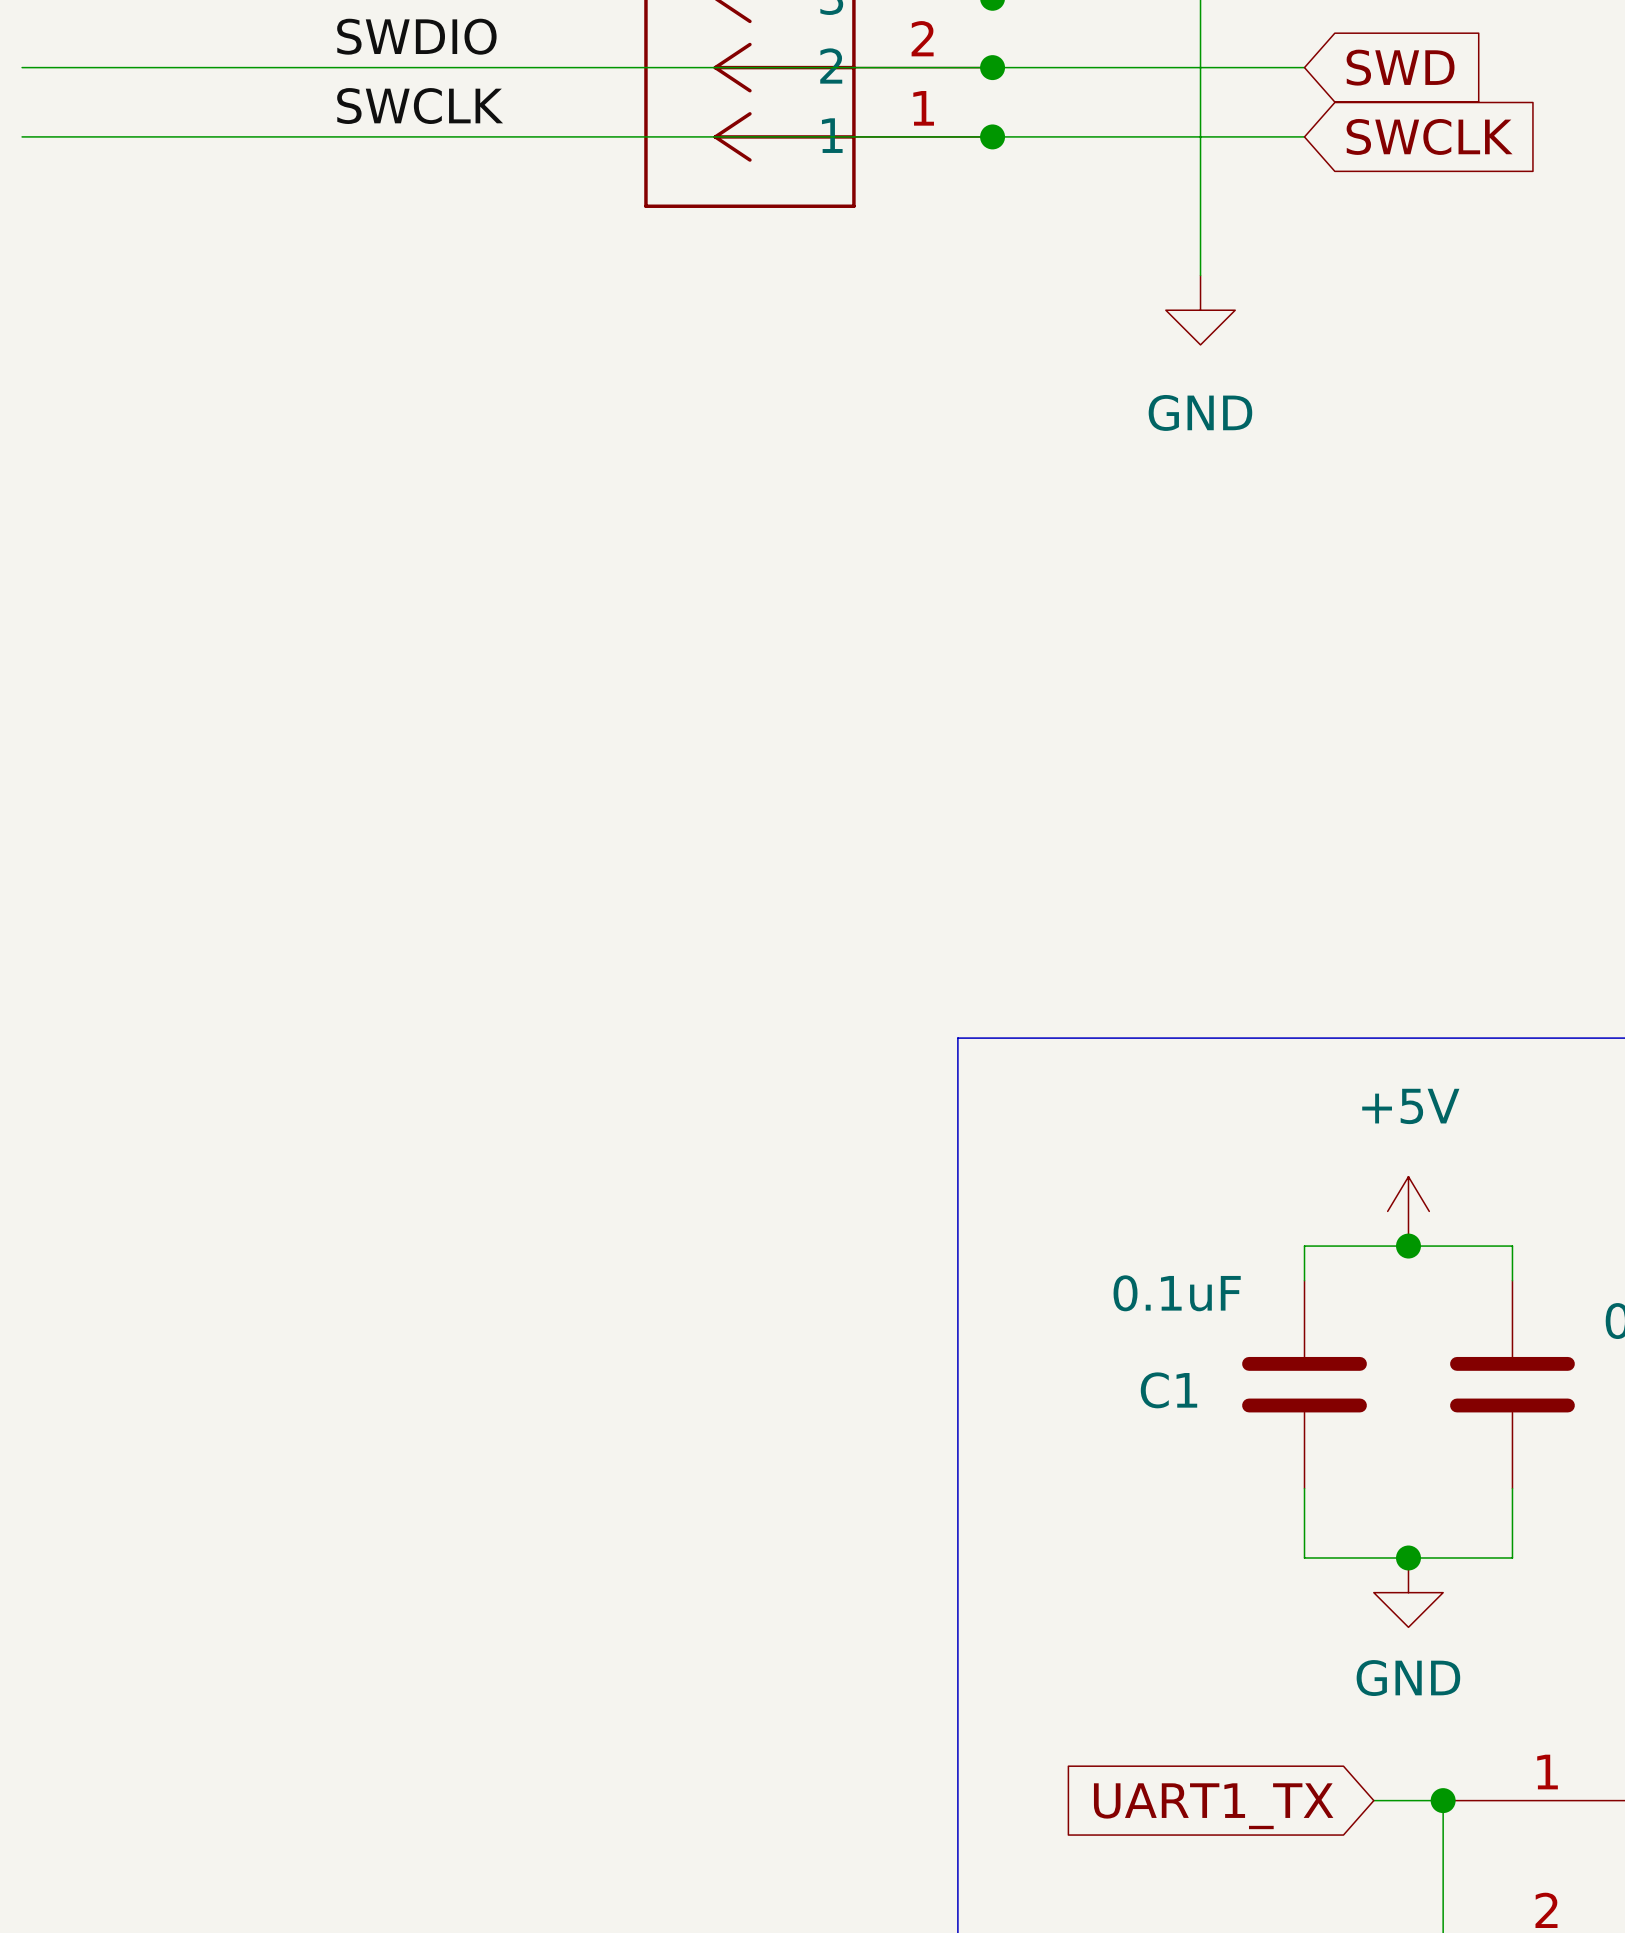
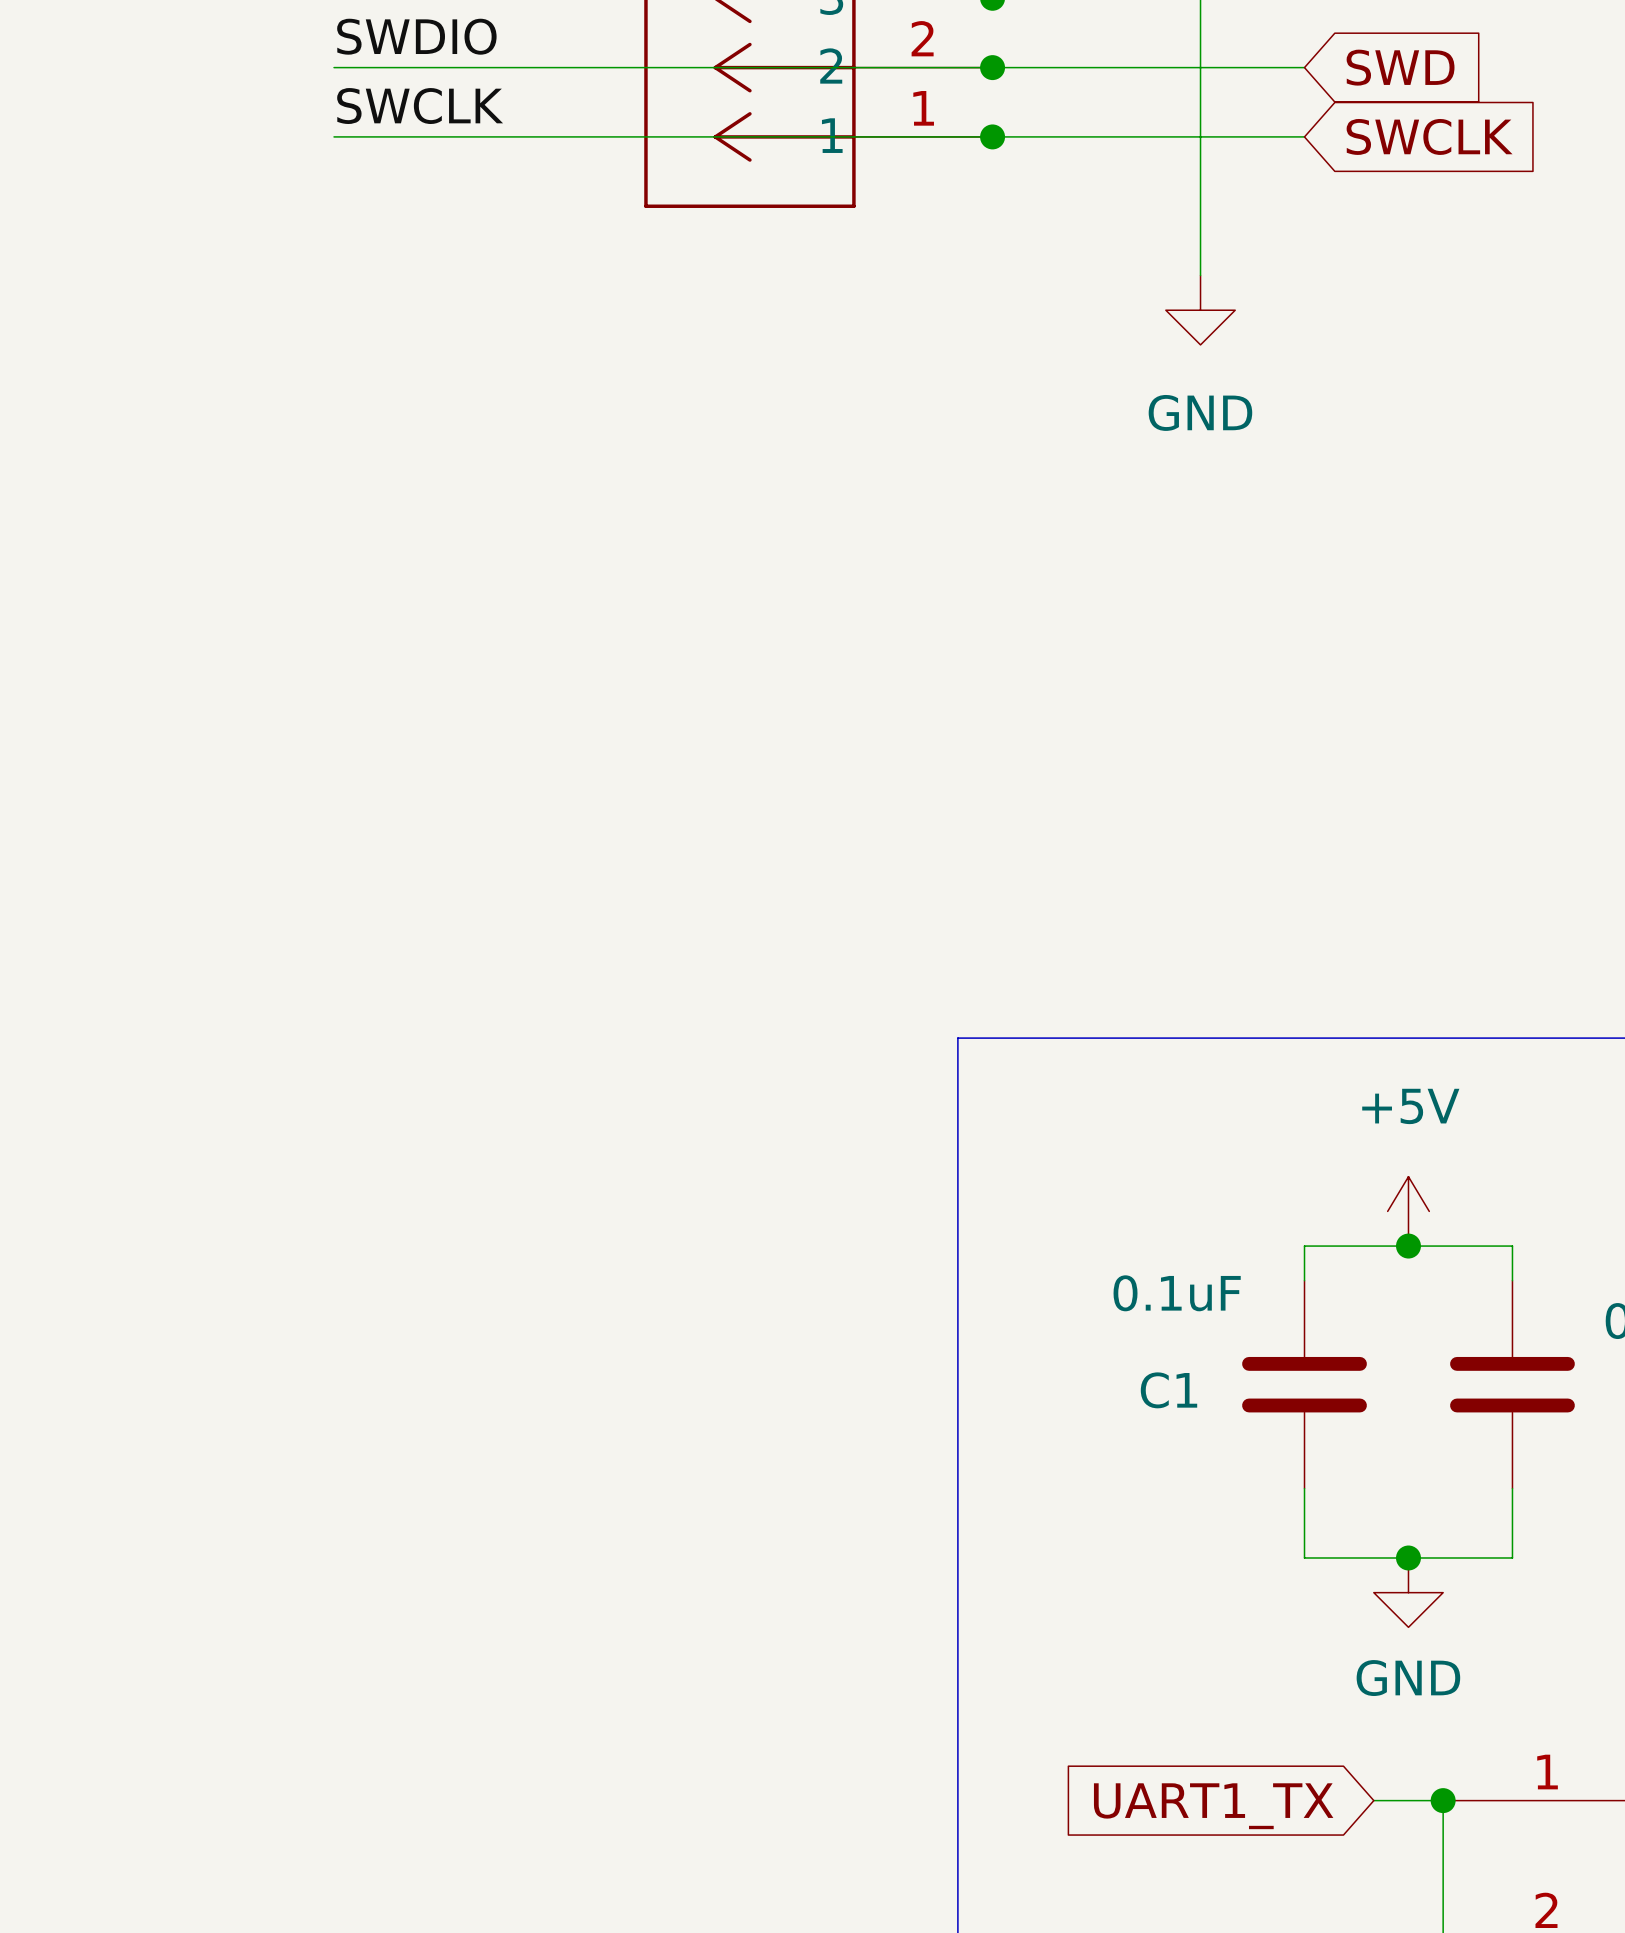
wire: (22, 67) (334, 67) -> none
wire: (22, 136) (334, 136) -> none

